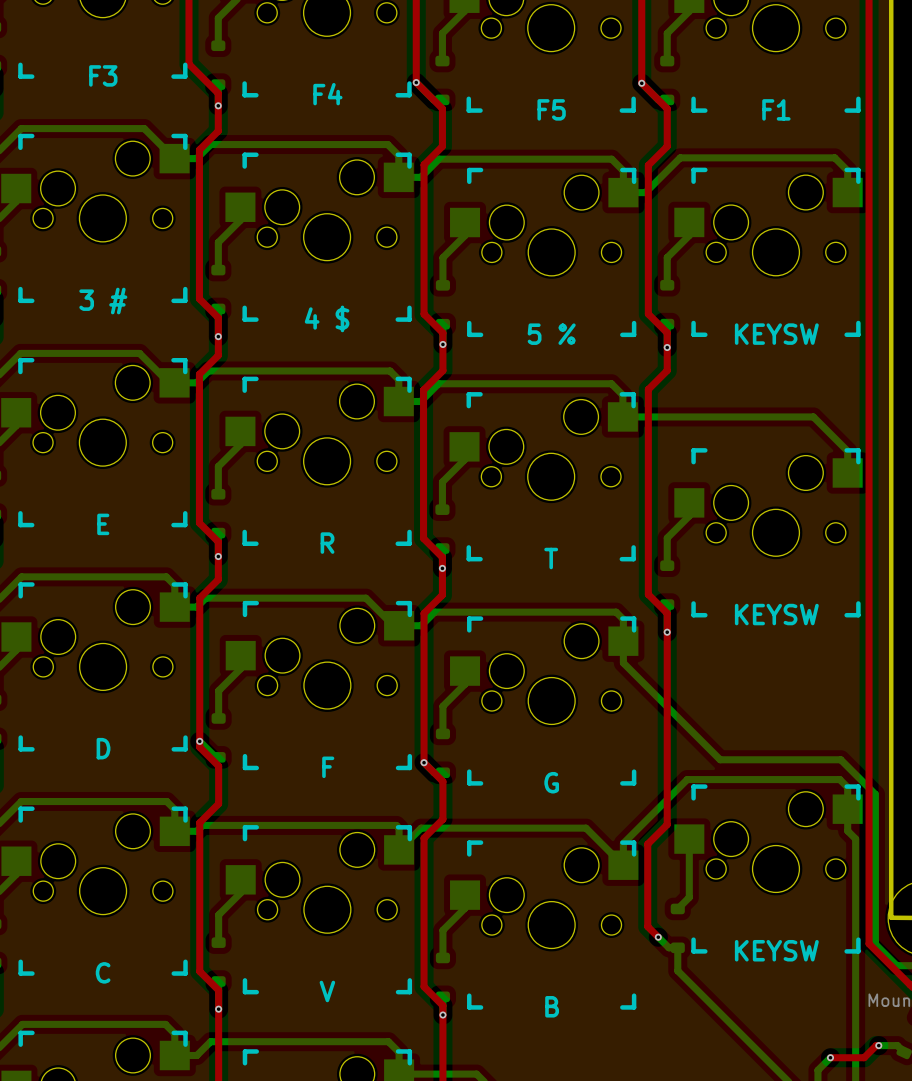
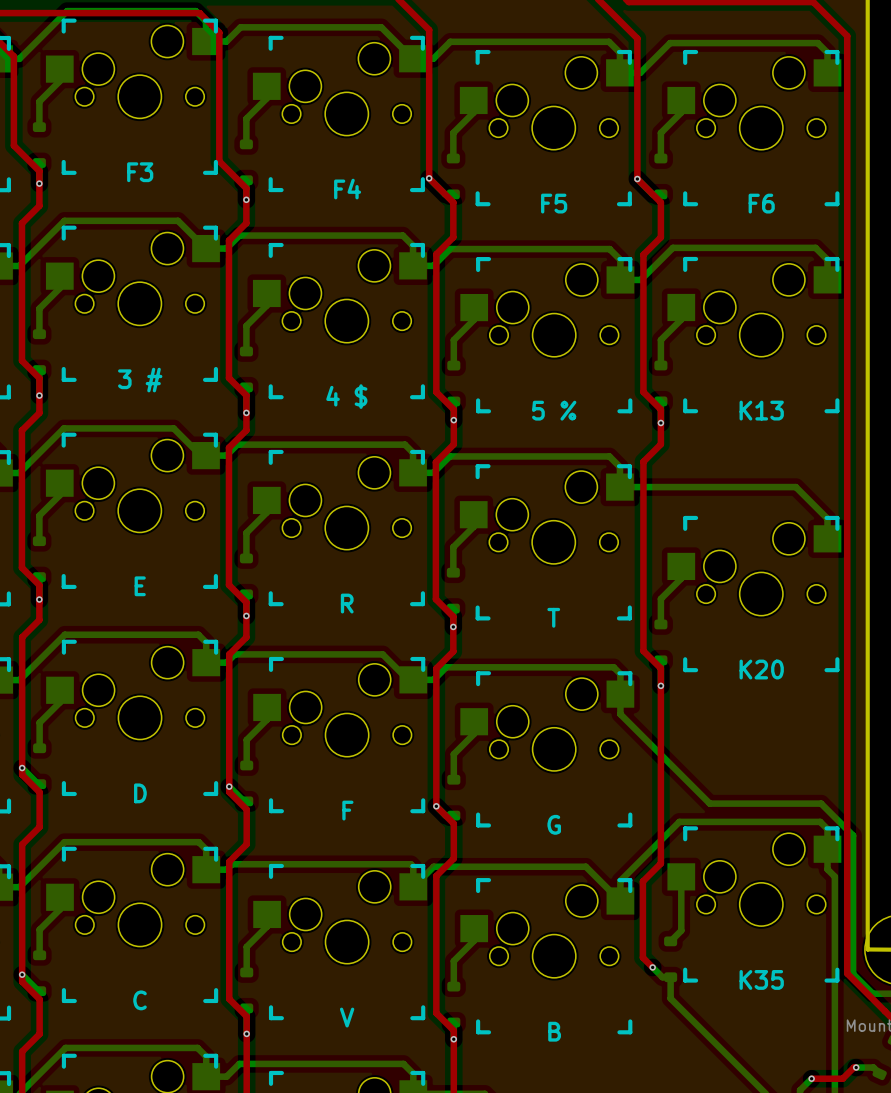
part value: F1 (776, 109) -> F6 (761, 203)
part value: KEYSW (776, 334) -> K13 (761, 410)
part value: KEYSW (776, 614) -> K20 (761, 669)
part value: KEYSW (776, 950) -> K35 (761, 979)

